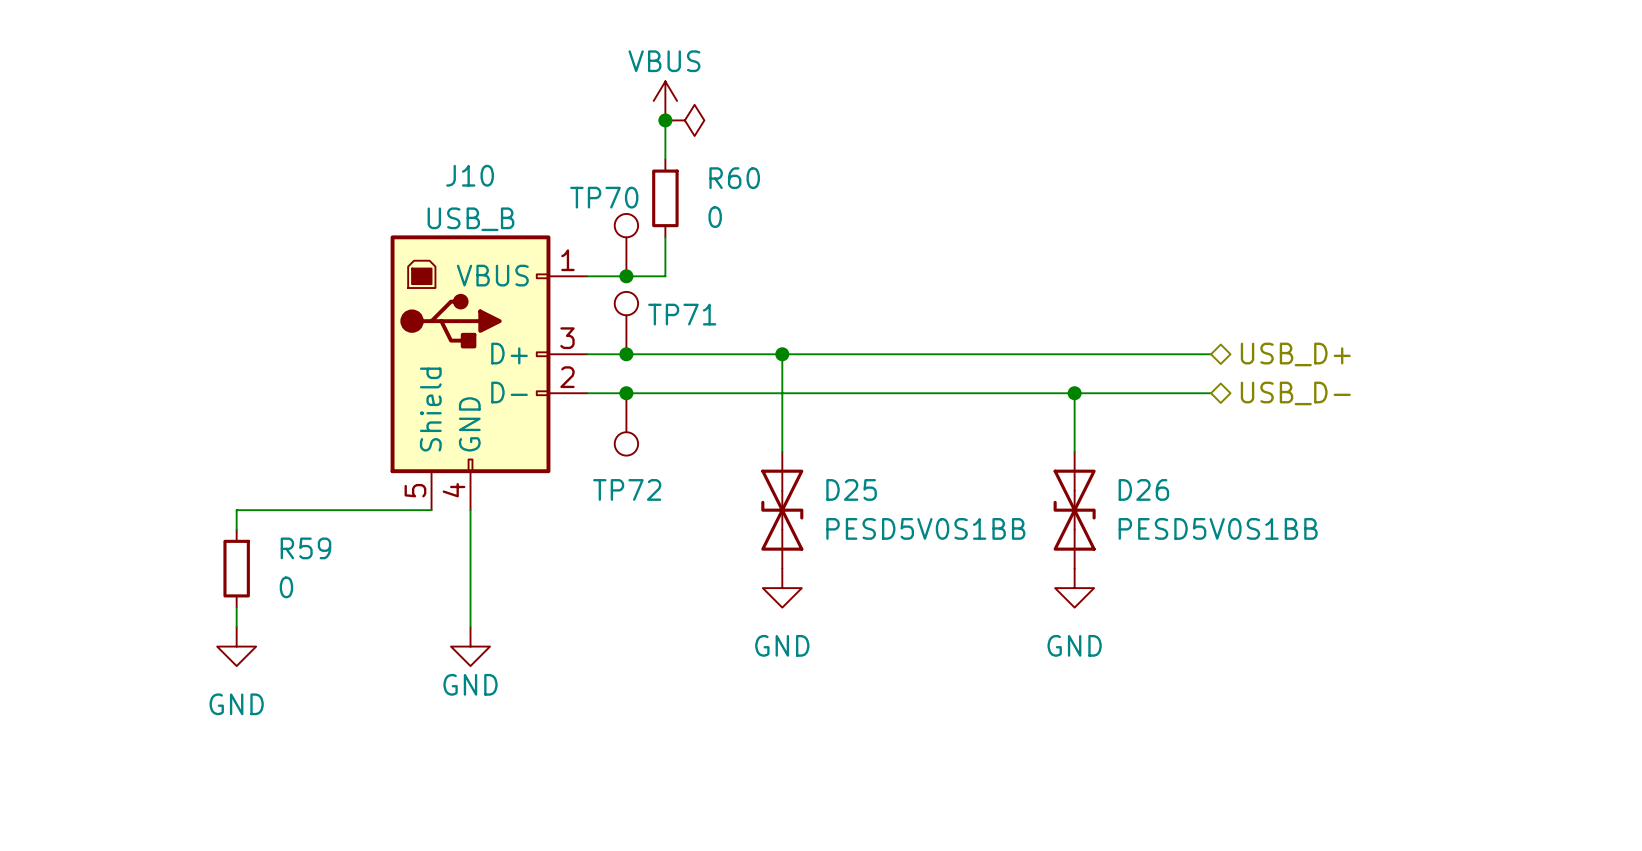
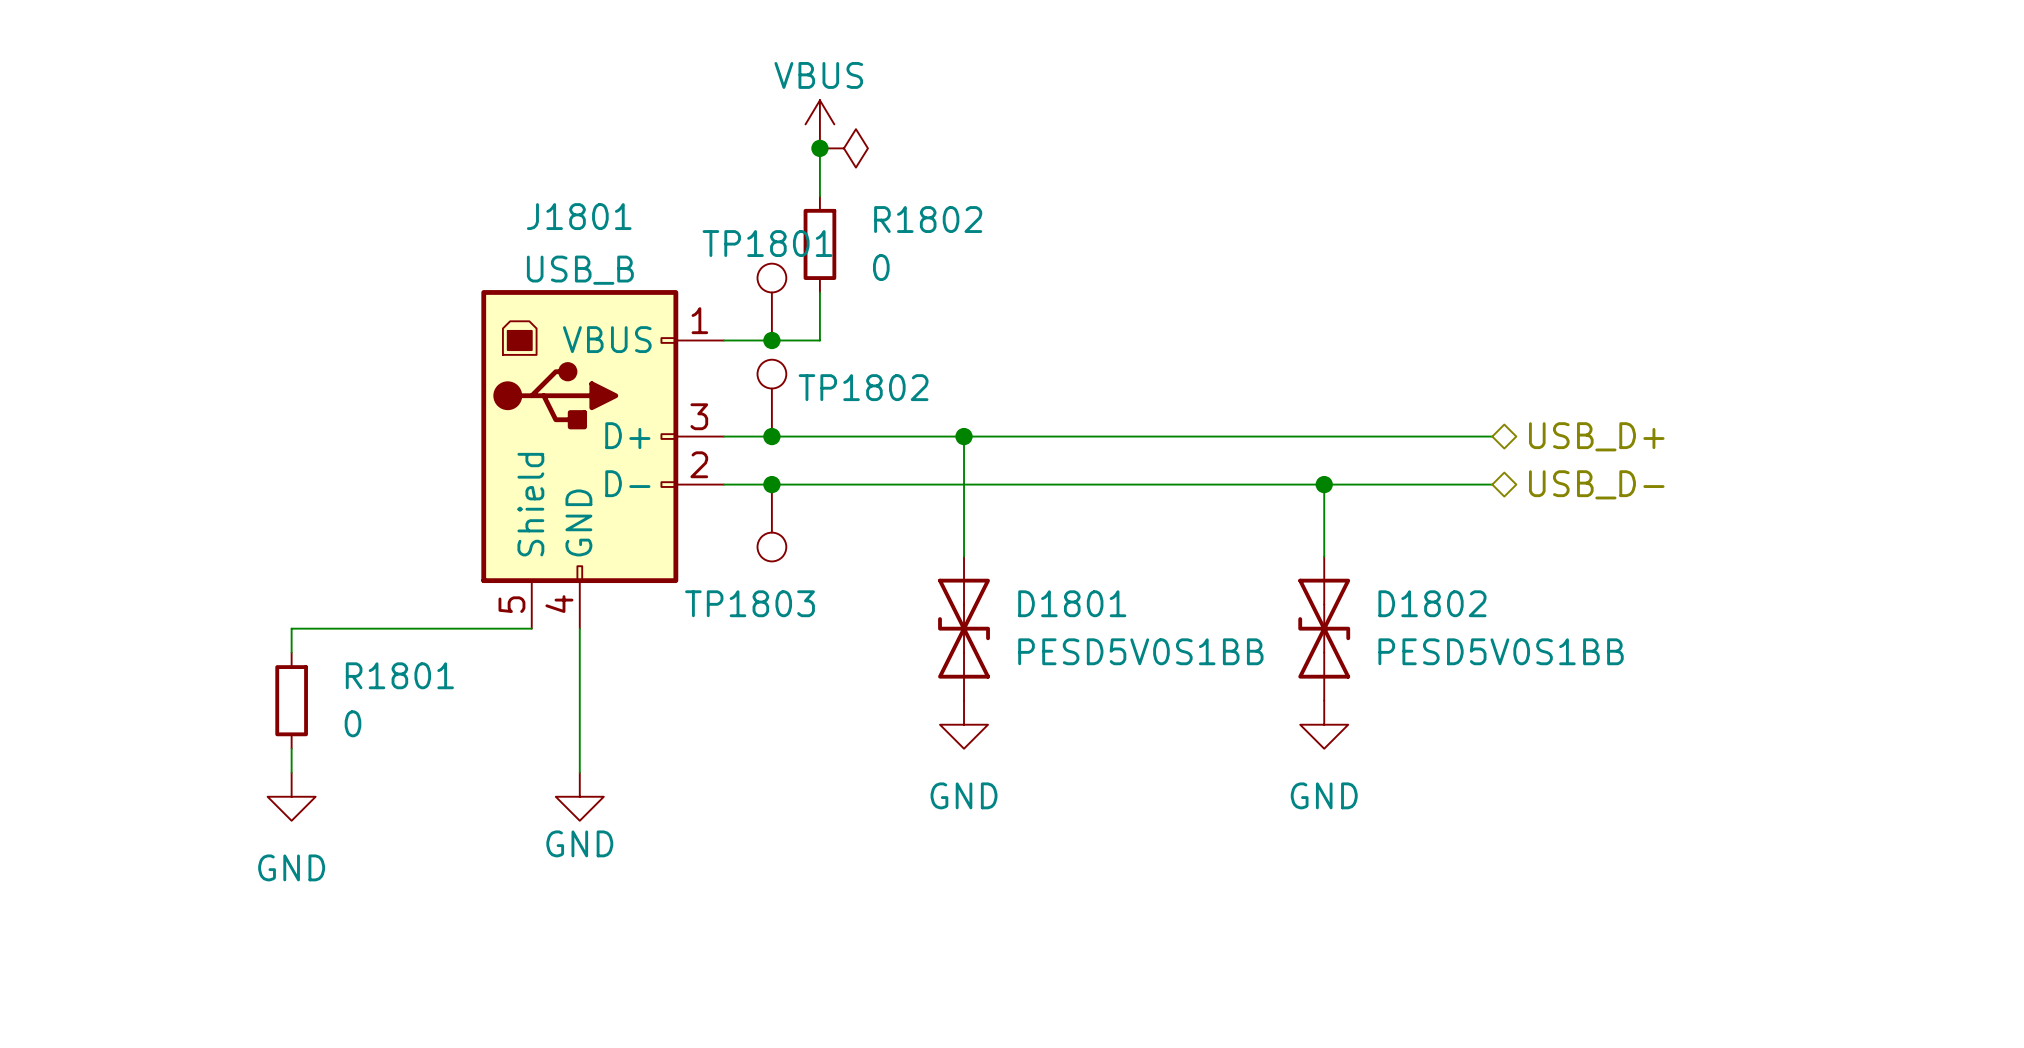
J10 name: J10 (470, 175) -> J1801 (579, 216)
R60 name: R60 (734, 178) -> R1802 (928, 219)
TP70 name: TP70 (604, 197) -> TP1801 (767, 243)
TP71 name: TP71 (682, 314) -> TP1802 (863, 387)
TP72 name: TP72 (627, 489) -> TP1803 (750, 603)
D25 name: D25 (851, 489) -> D1801 (1072, 603)
D26 name: D26 (1143, 489) -> D1802 (1432, 603)
R59 name: R59 (305, 548) -> R1801 (399, 675)

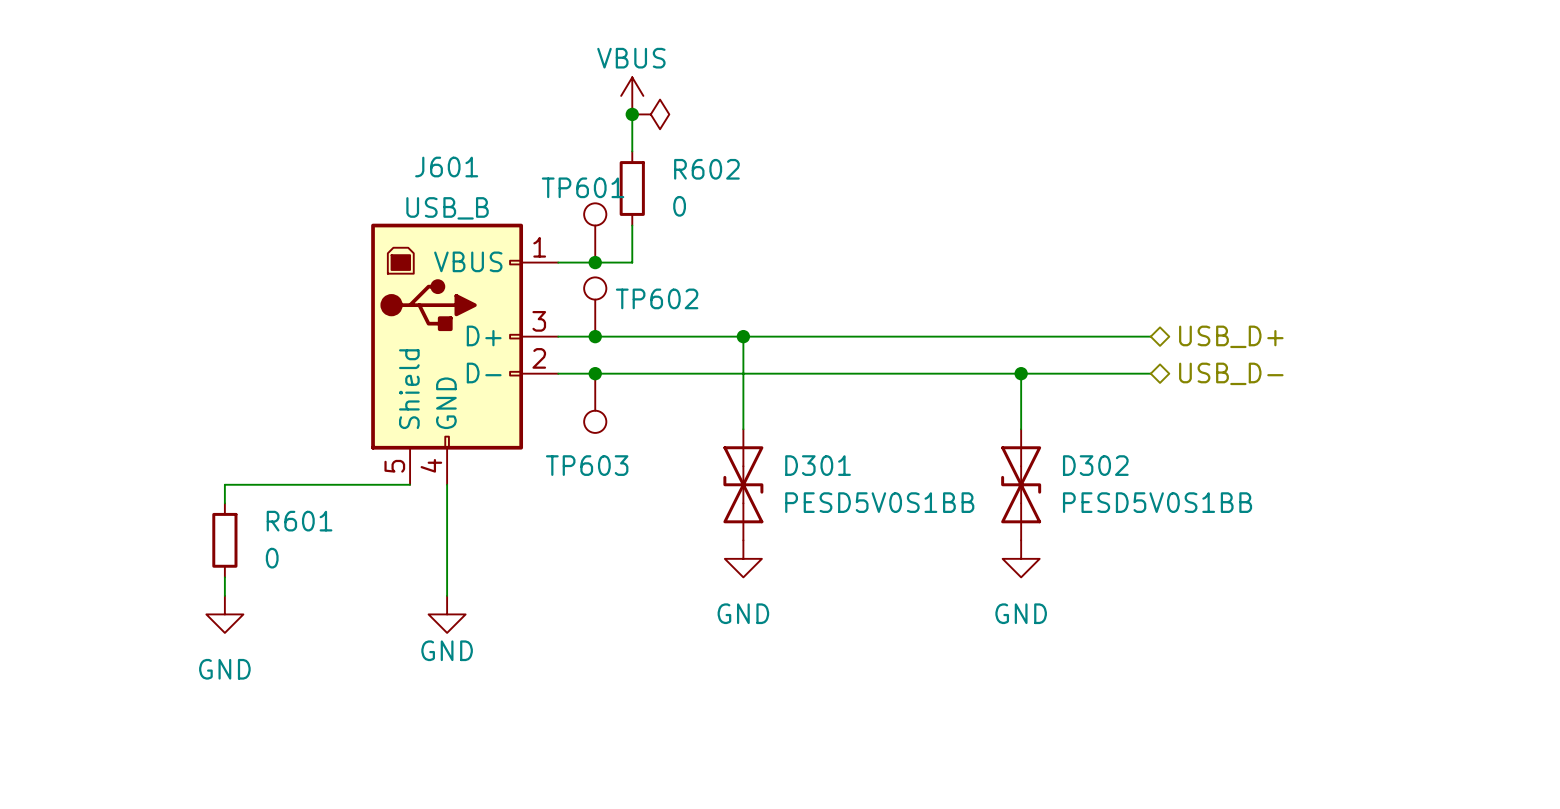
J1801 name: J1801 (579, 216) -> J601 (446, 167)
R1802 name: R1802 (928, 219) -> R602 (706, 169)
TP1801 name: TP1801 (767, 243) -> TP601 (583, 187)
TP1802 name: TP1802 (863, 387) -> TP602 (657, 298)
TP1803 name: TP1803 (750, 603) -> TP603 (587, 465)
D1801 name: D1801 (1072, 603) -> D301 (818, 465)
D1802 name: D1802 (1432, 603) -> D302 (1095, 465)
R1801 name: R1801 (399, 675) -> R601 (299, 521)

